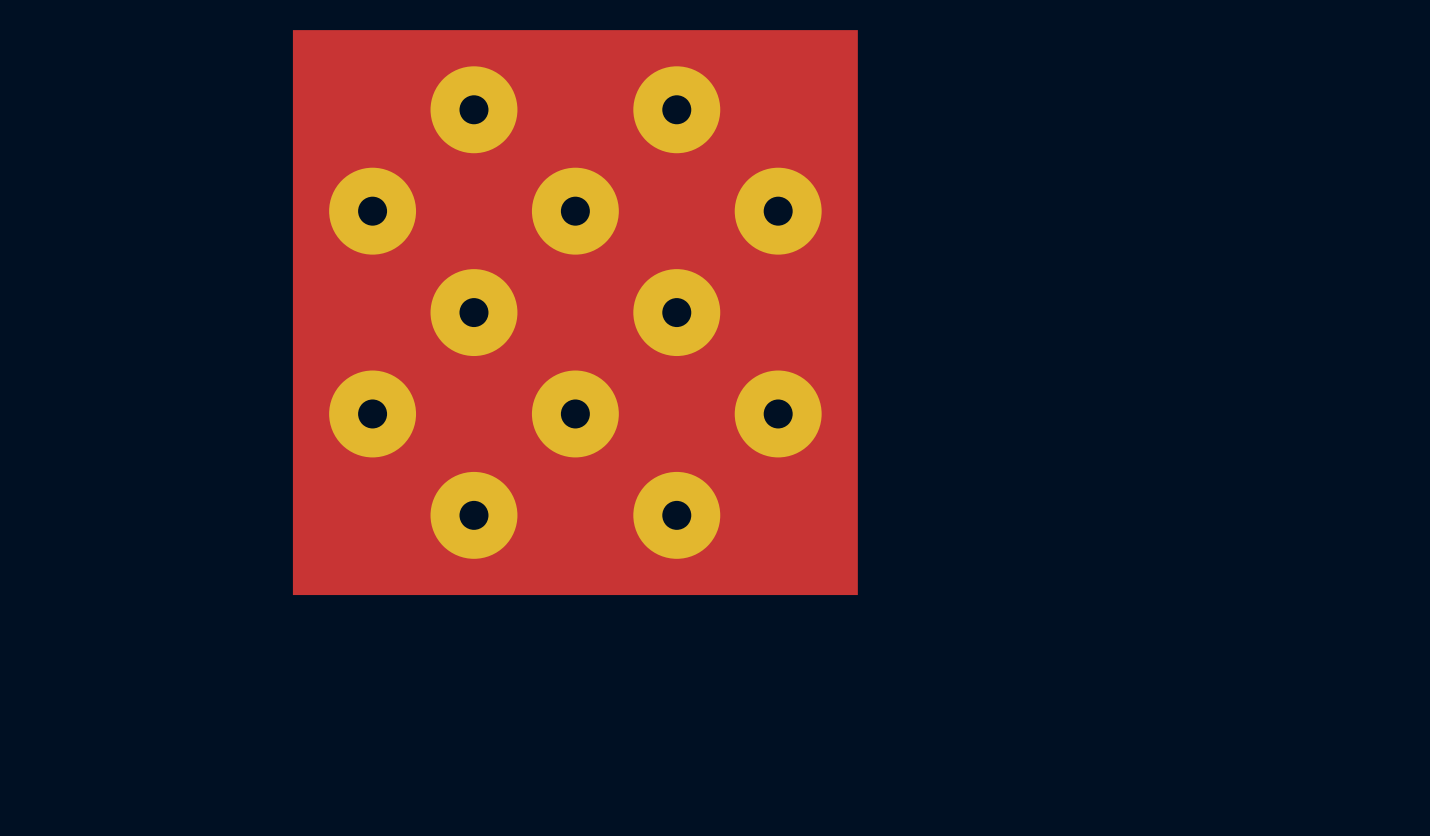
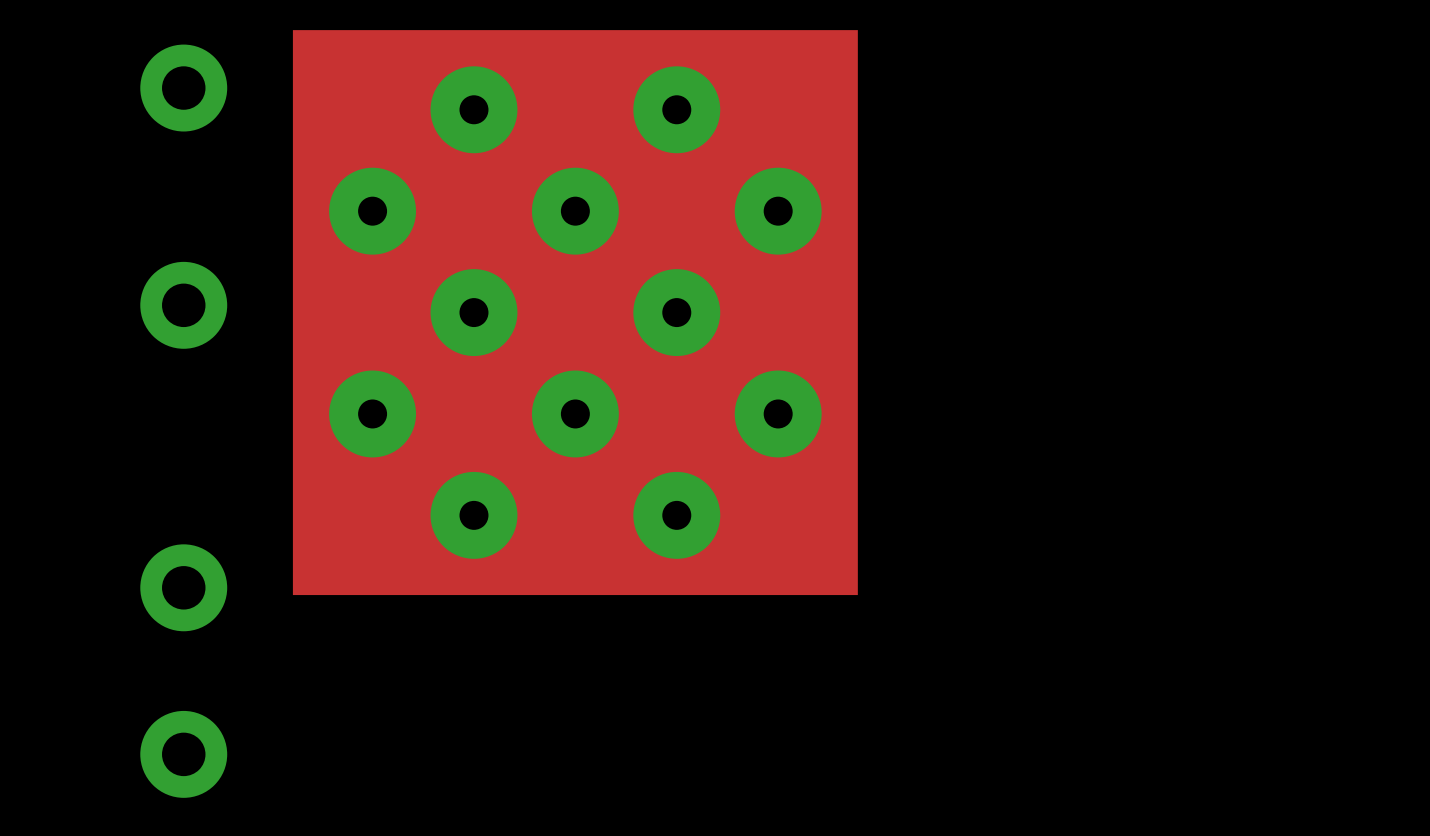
via: none -> (183, 88)
via: none -> (183, 305)
via: none -> (183, 587)
via: none -> (183, 754)

